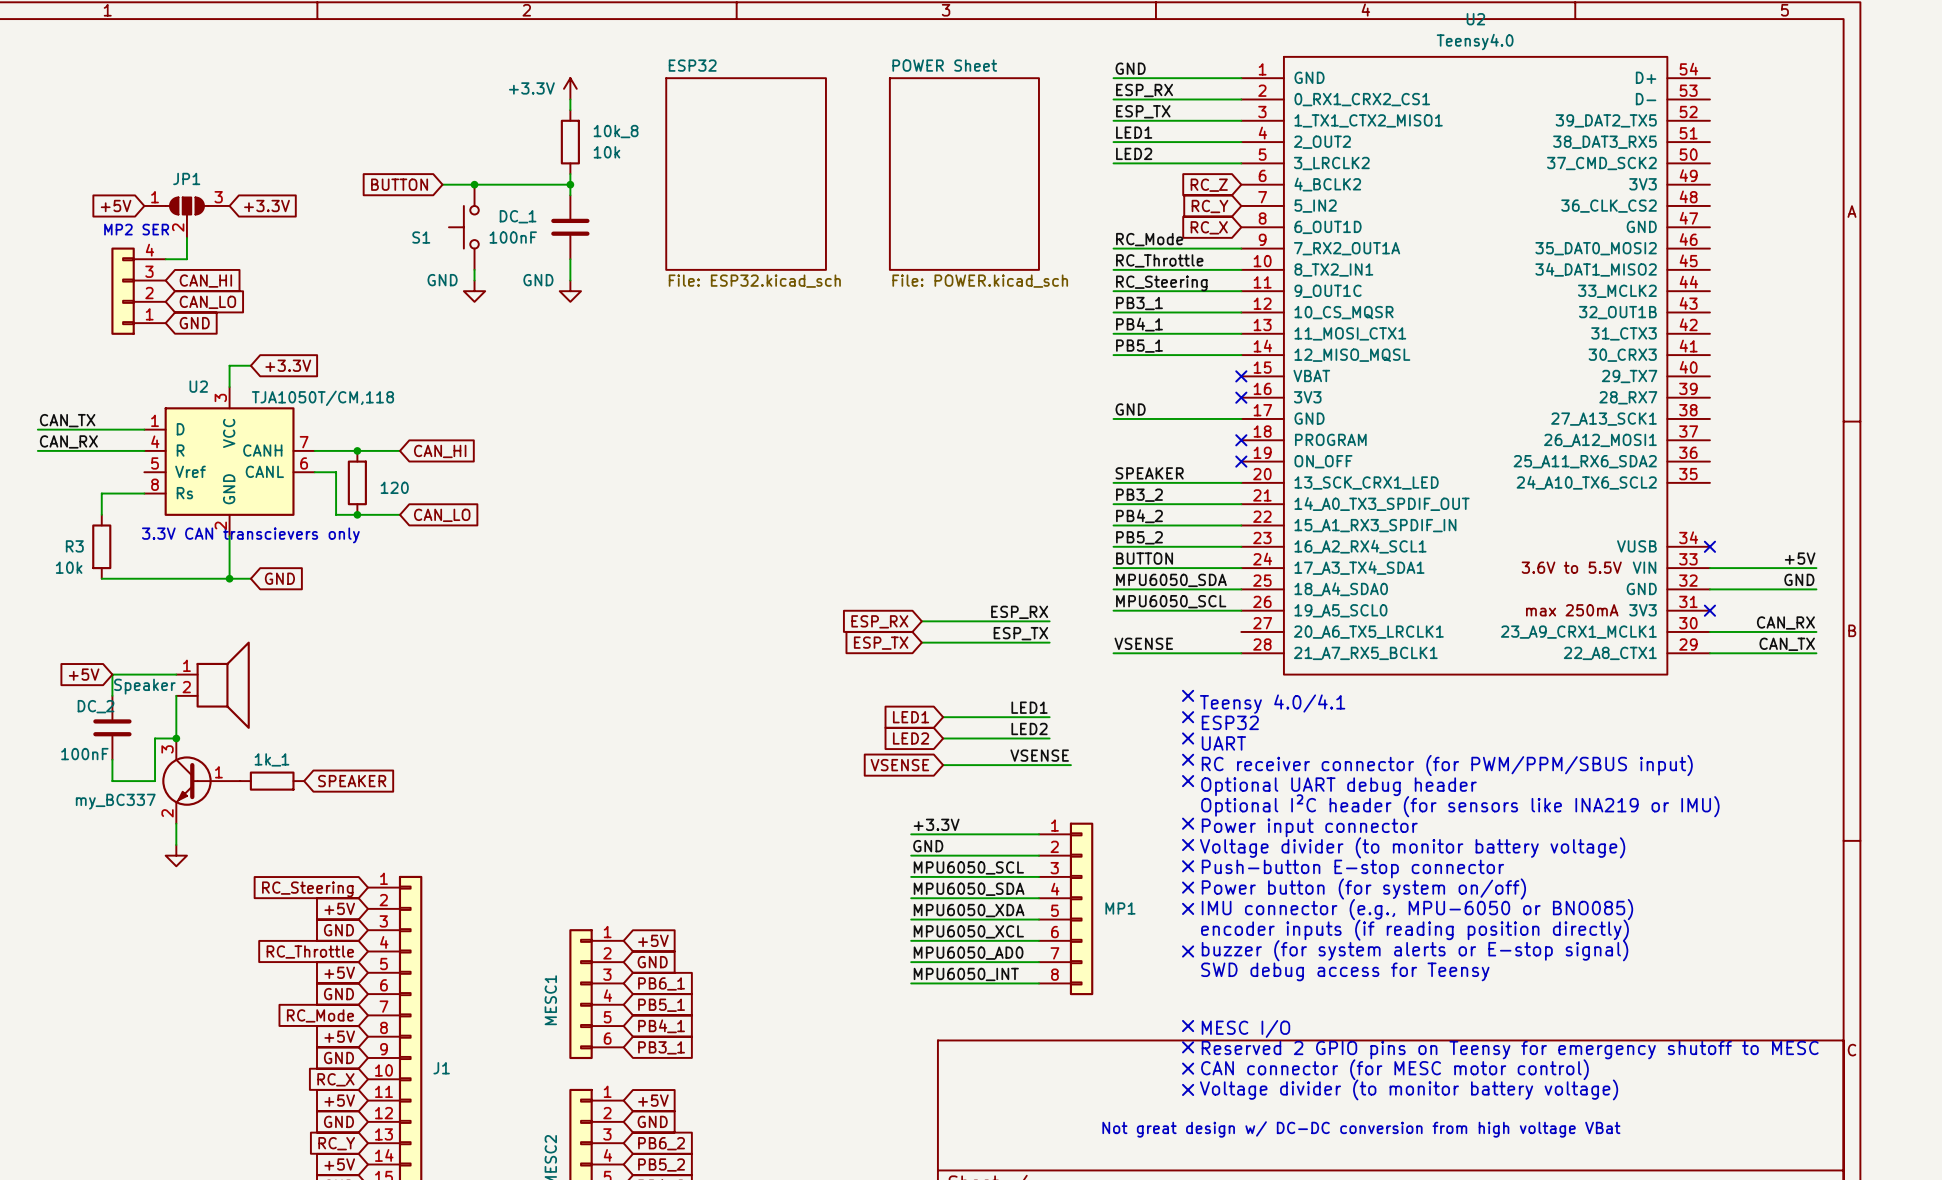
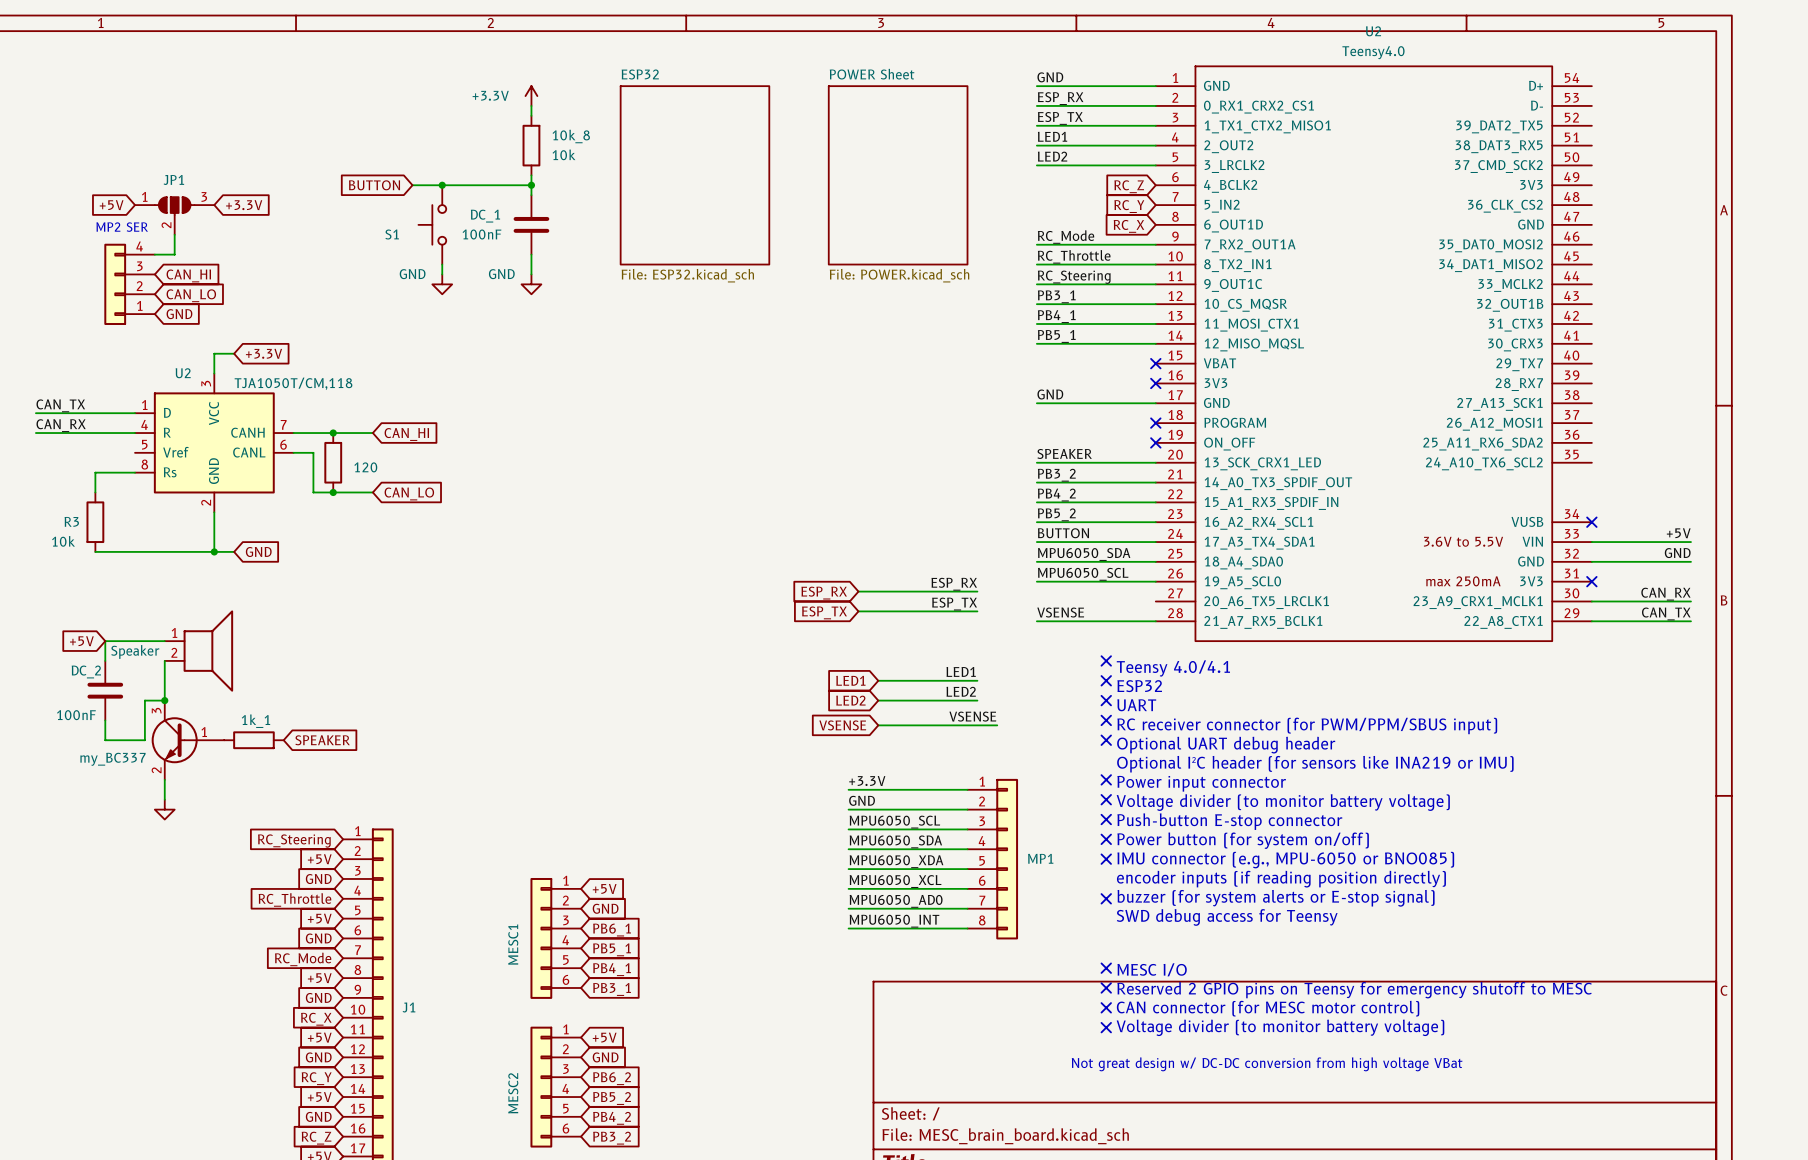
text: 3.3V CAN transcievers only (250, 535) -> none

